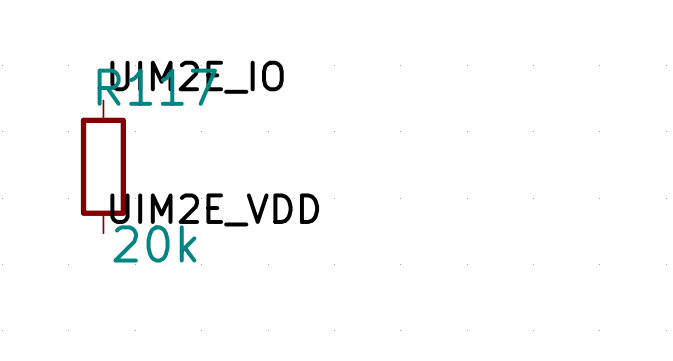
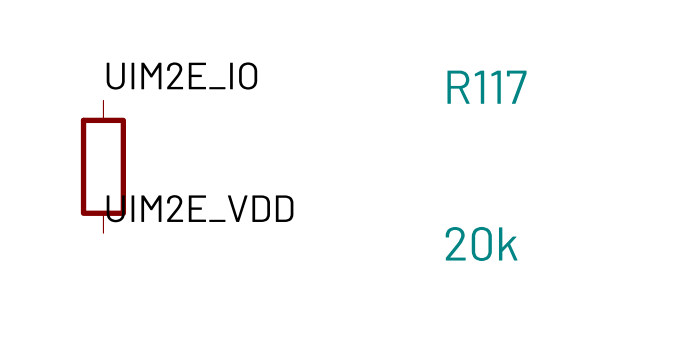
R117 name position: R117 (157, 87) -> R117 (487, 87)
R117 value position: 20k (154, 243) -> 20k (481, 243)

